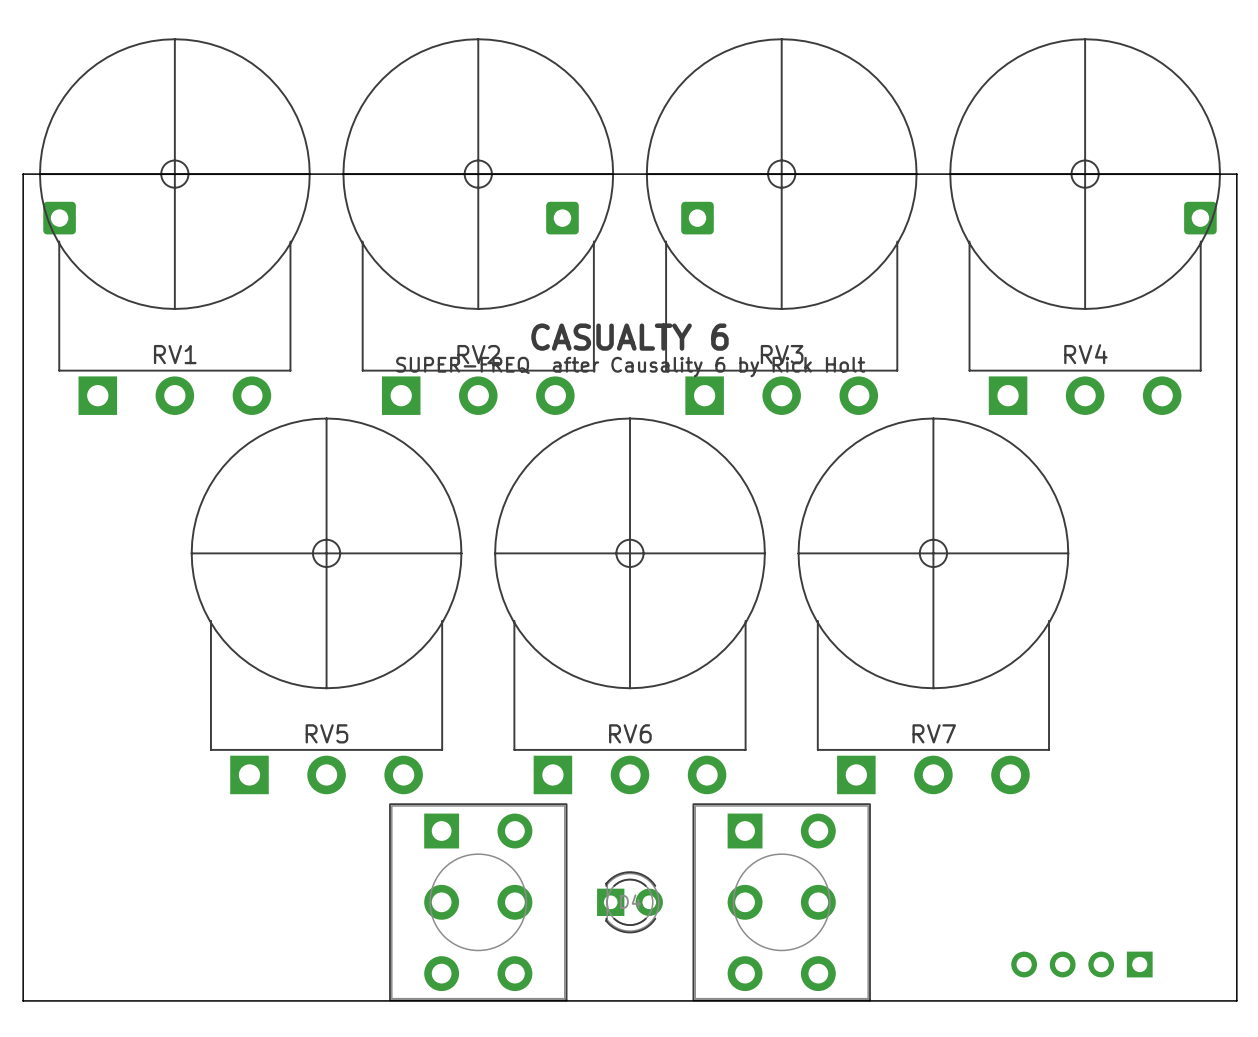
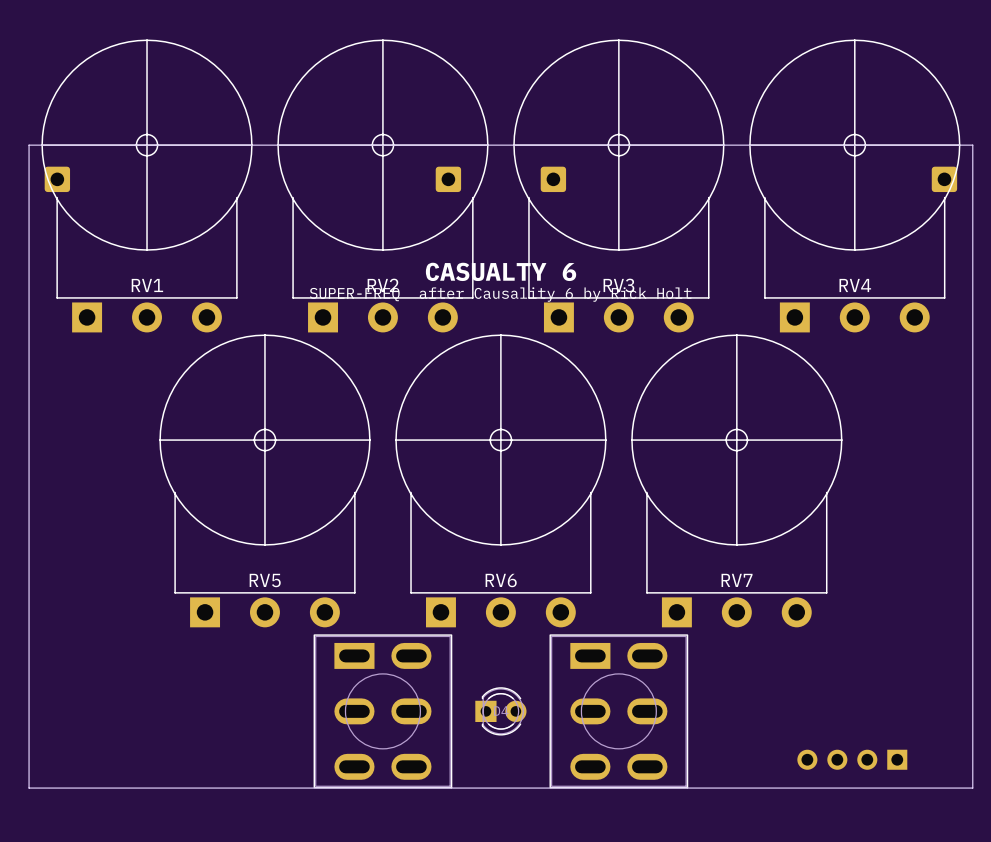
part footprint: [389, 803, 568, 1002] -> [313, 634, 453, 789]
part footprint: [692, 803, 871, 1002] -> [549, 634, 689, 789]

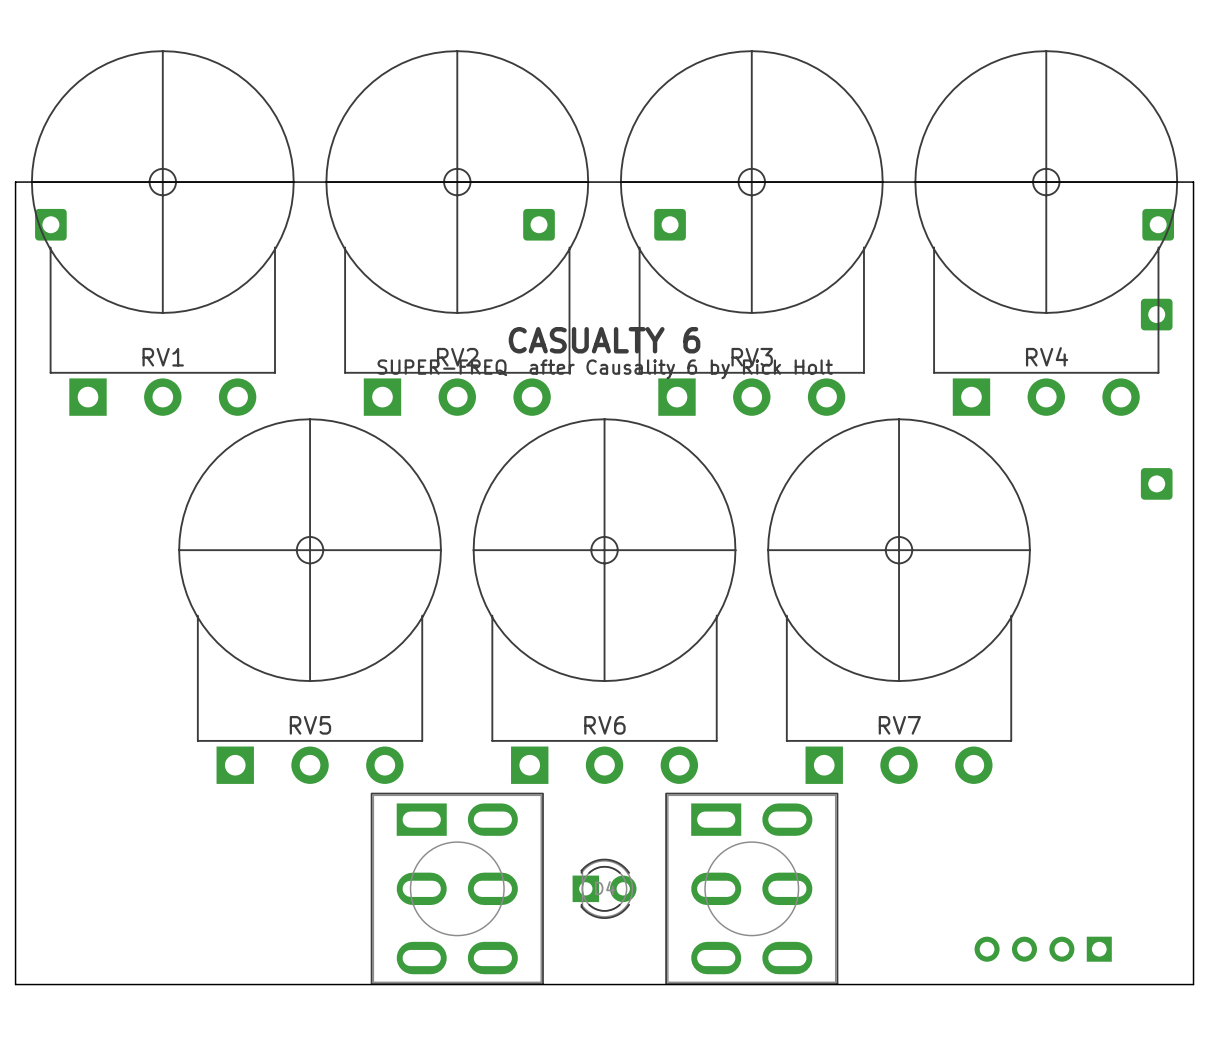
part: none -> (1156, 314)
part: none -> (1156, 483)

